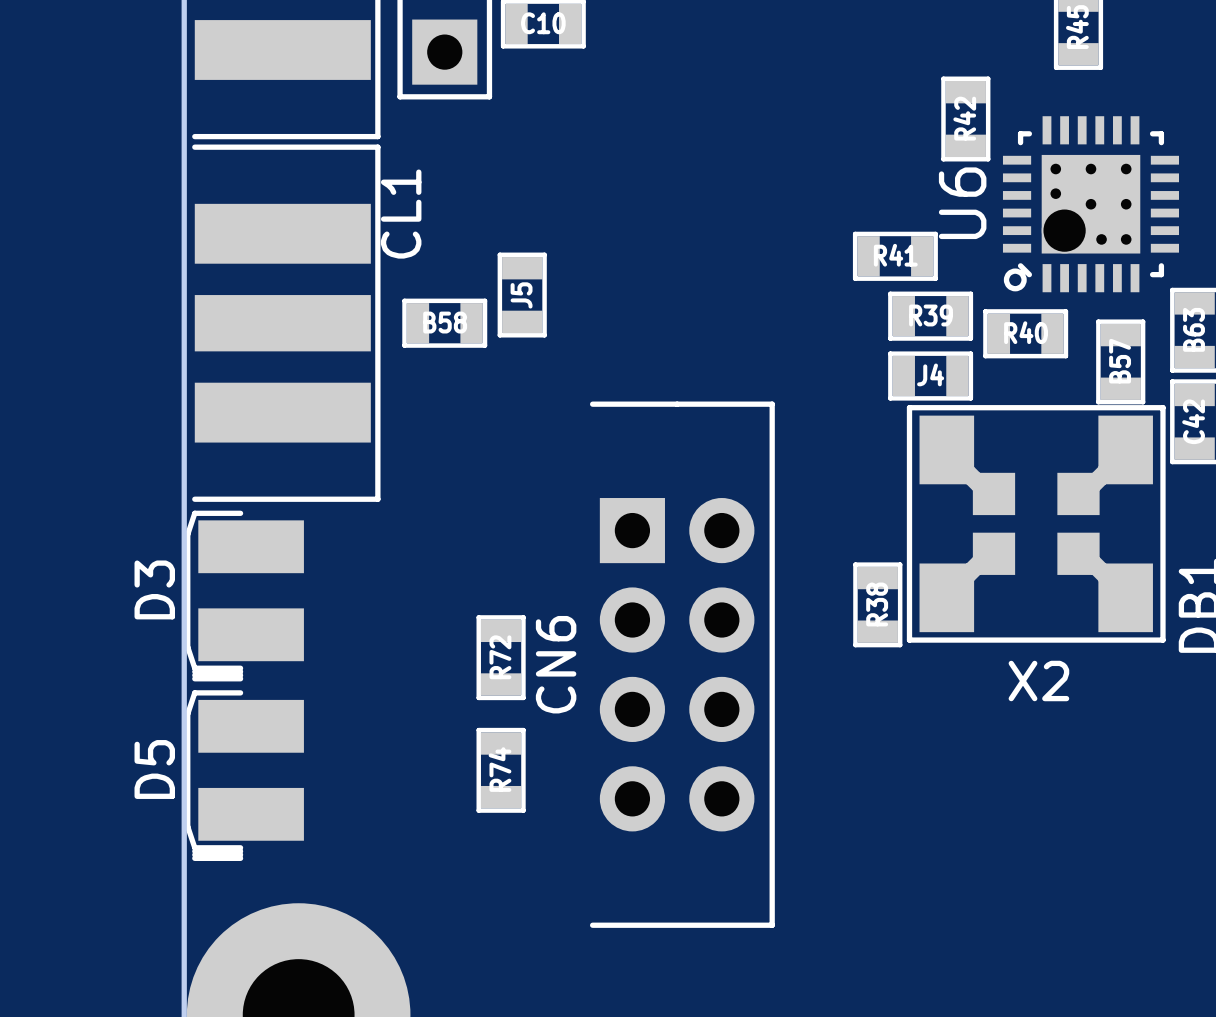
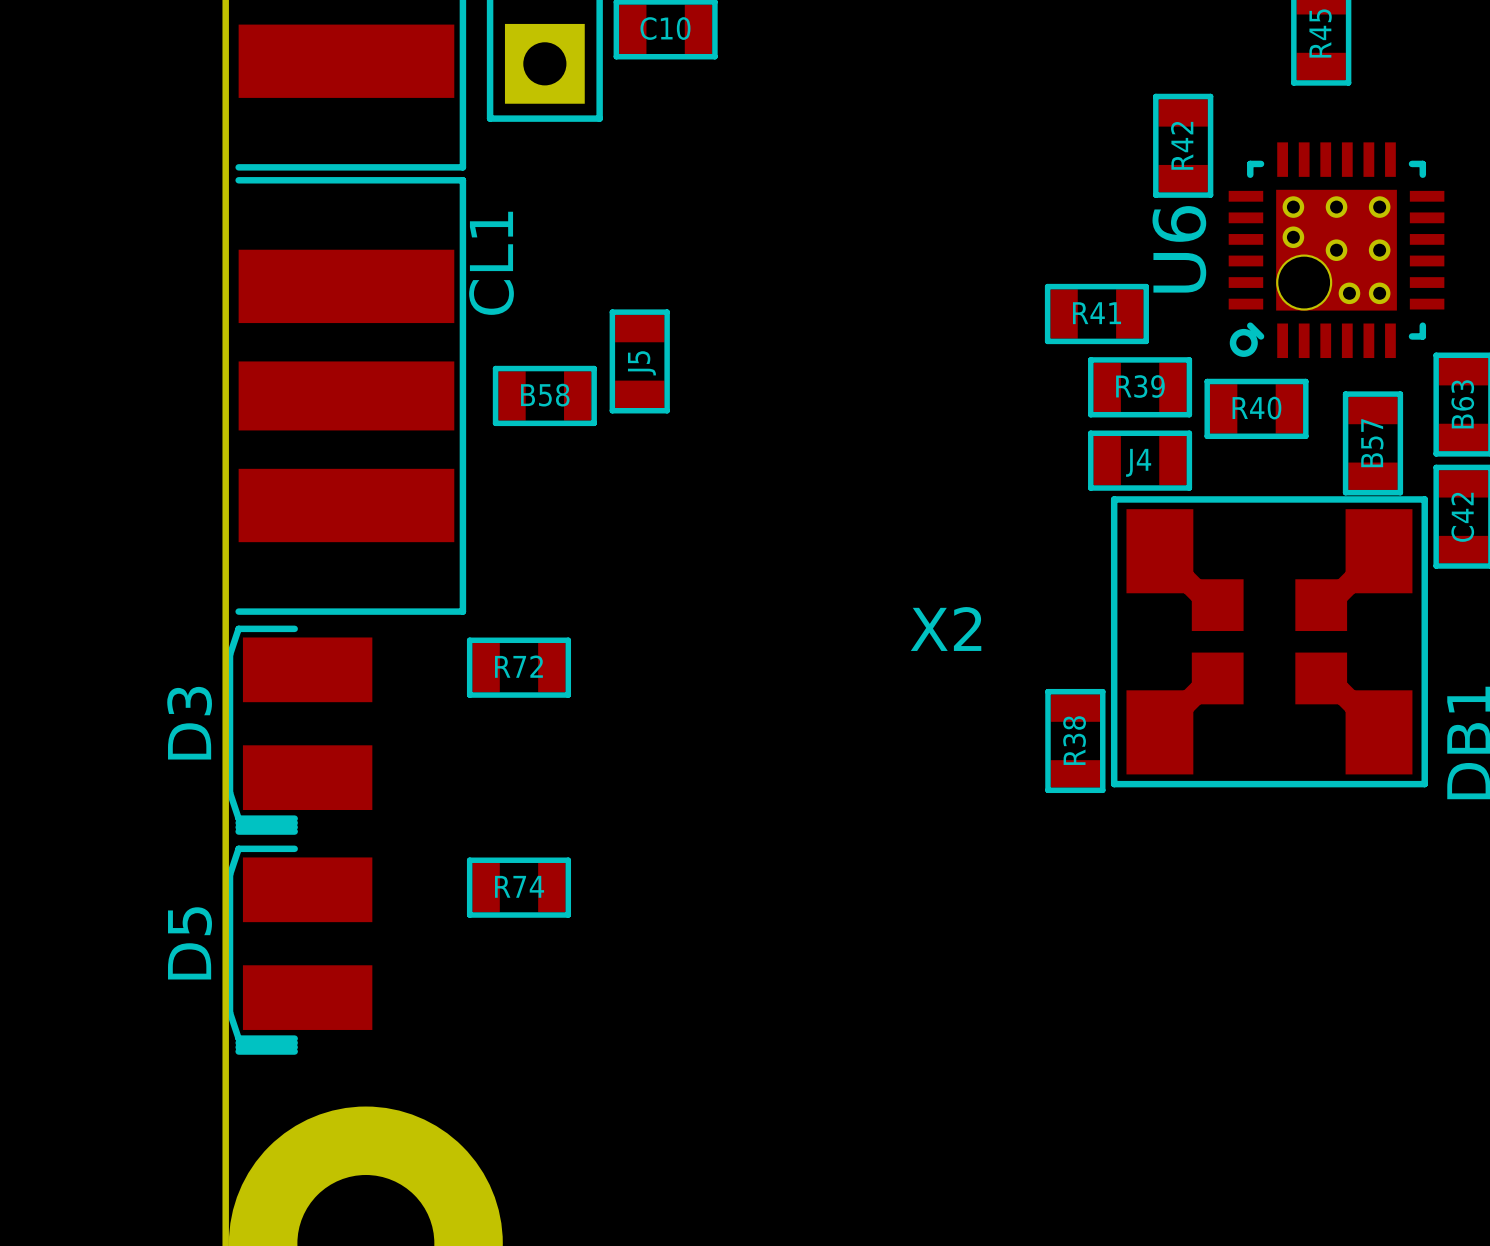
R72 rotation: 0° (501, 657) -> 90° clockwise (518, 667)
R72 position: (501, 657) -> (518, 667)
CN6: (682, 664) -> none
X2 name position: X2 (1038, 681) -> X2 (946, 629)
R74 rotation: 0° (501, 770) -> 90° clockwise (518, 887)
R74 position: (501, 770) -> (518, 887)

